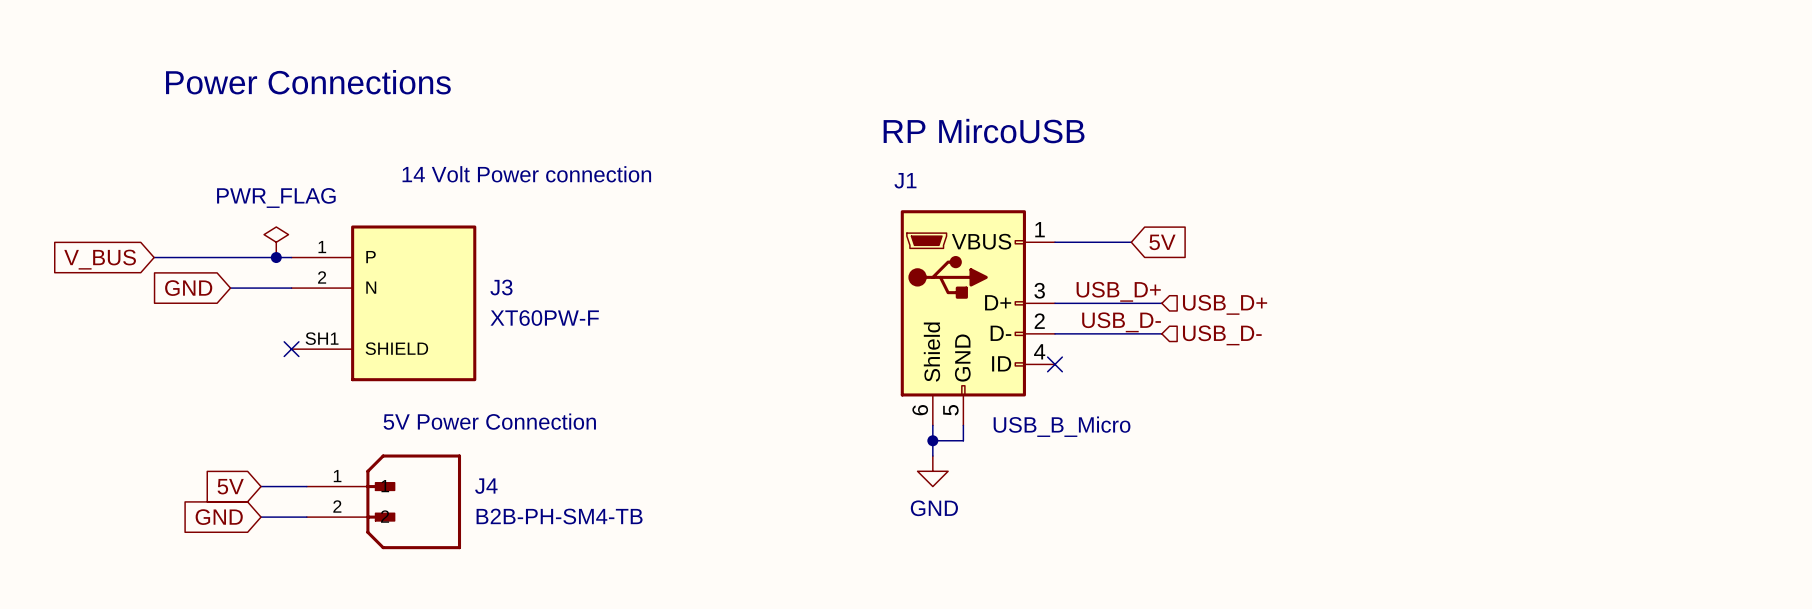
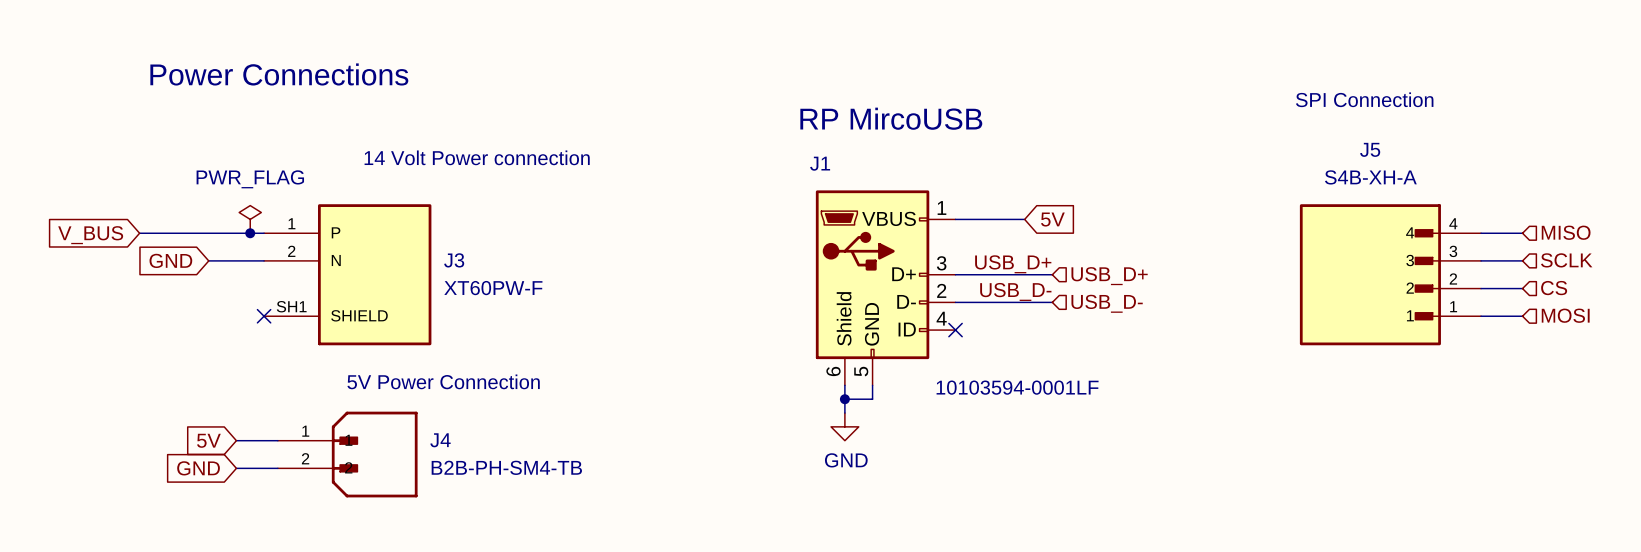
text: none -> SPI Connection (1364, 99)
hierarchical label: none -> MISO (1566, 232)
wire: none -> (1481, 233) (1522, 233)
hierarchical label: none -> SCLK (1566, 260)
wire: none -> (1481, 260) (1522, 260)
J5: none -> S4B-XH-A (1390, 274)
wire: none -> (1481, 288) (1522, 288)
hierarchical label: none -> CS (1554, 288)
hierarchical label: none -> MOSI (1565, 315)
wire: none -> (1481, 316) (1522, 316)
J1 value: USB_B_Micro (1062, 426) -> 10103594-0001LF (1017, 387)

